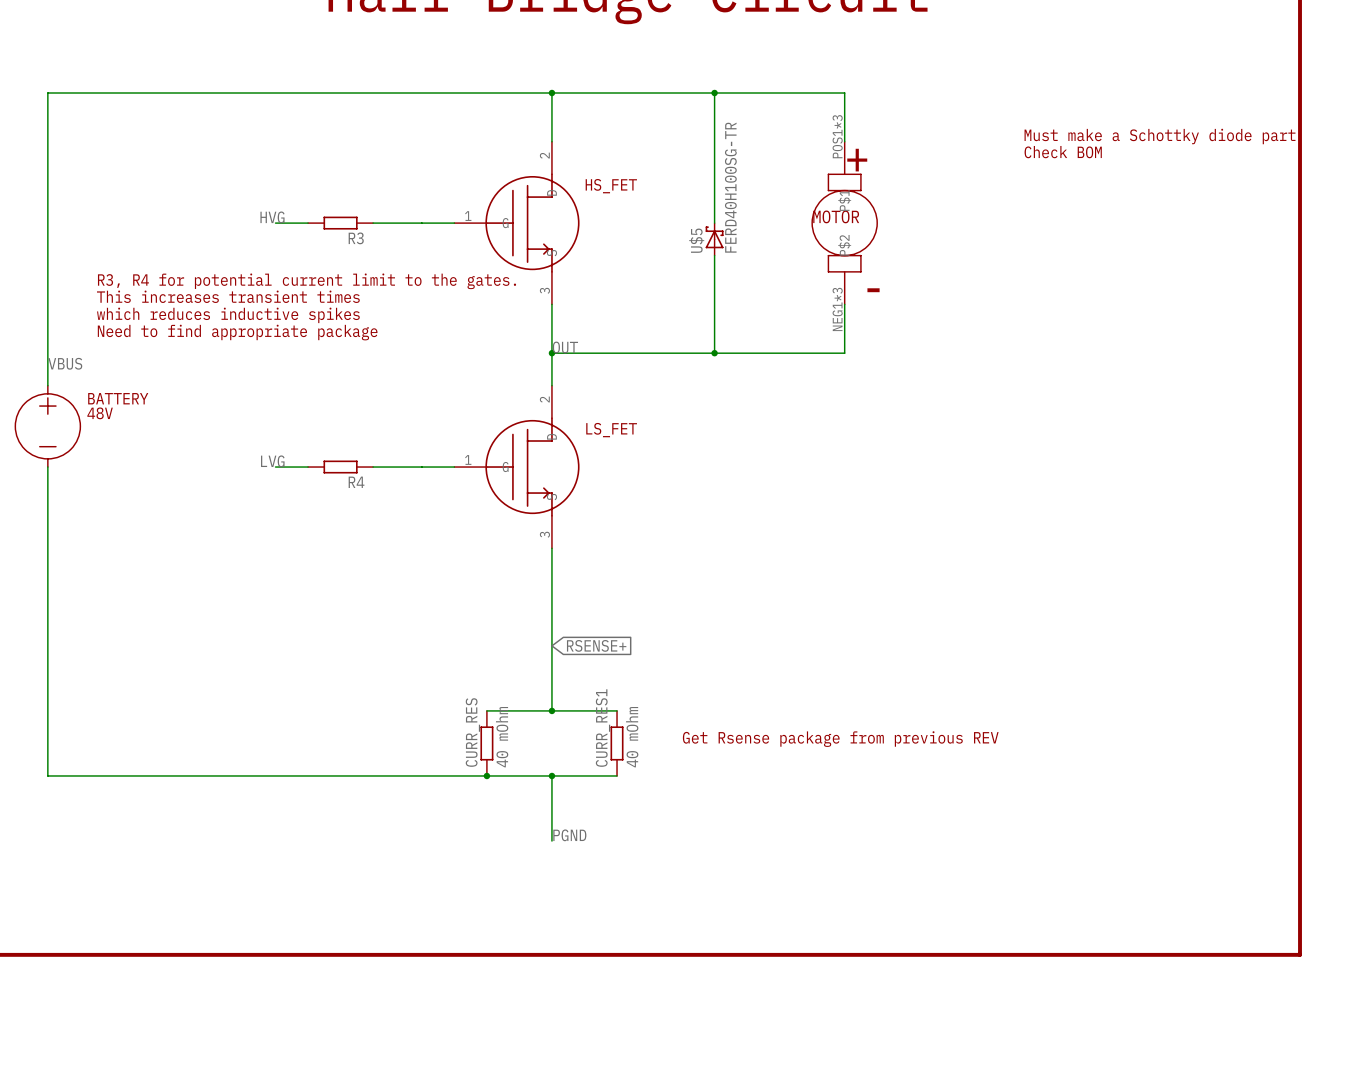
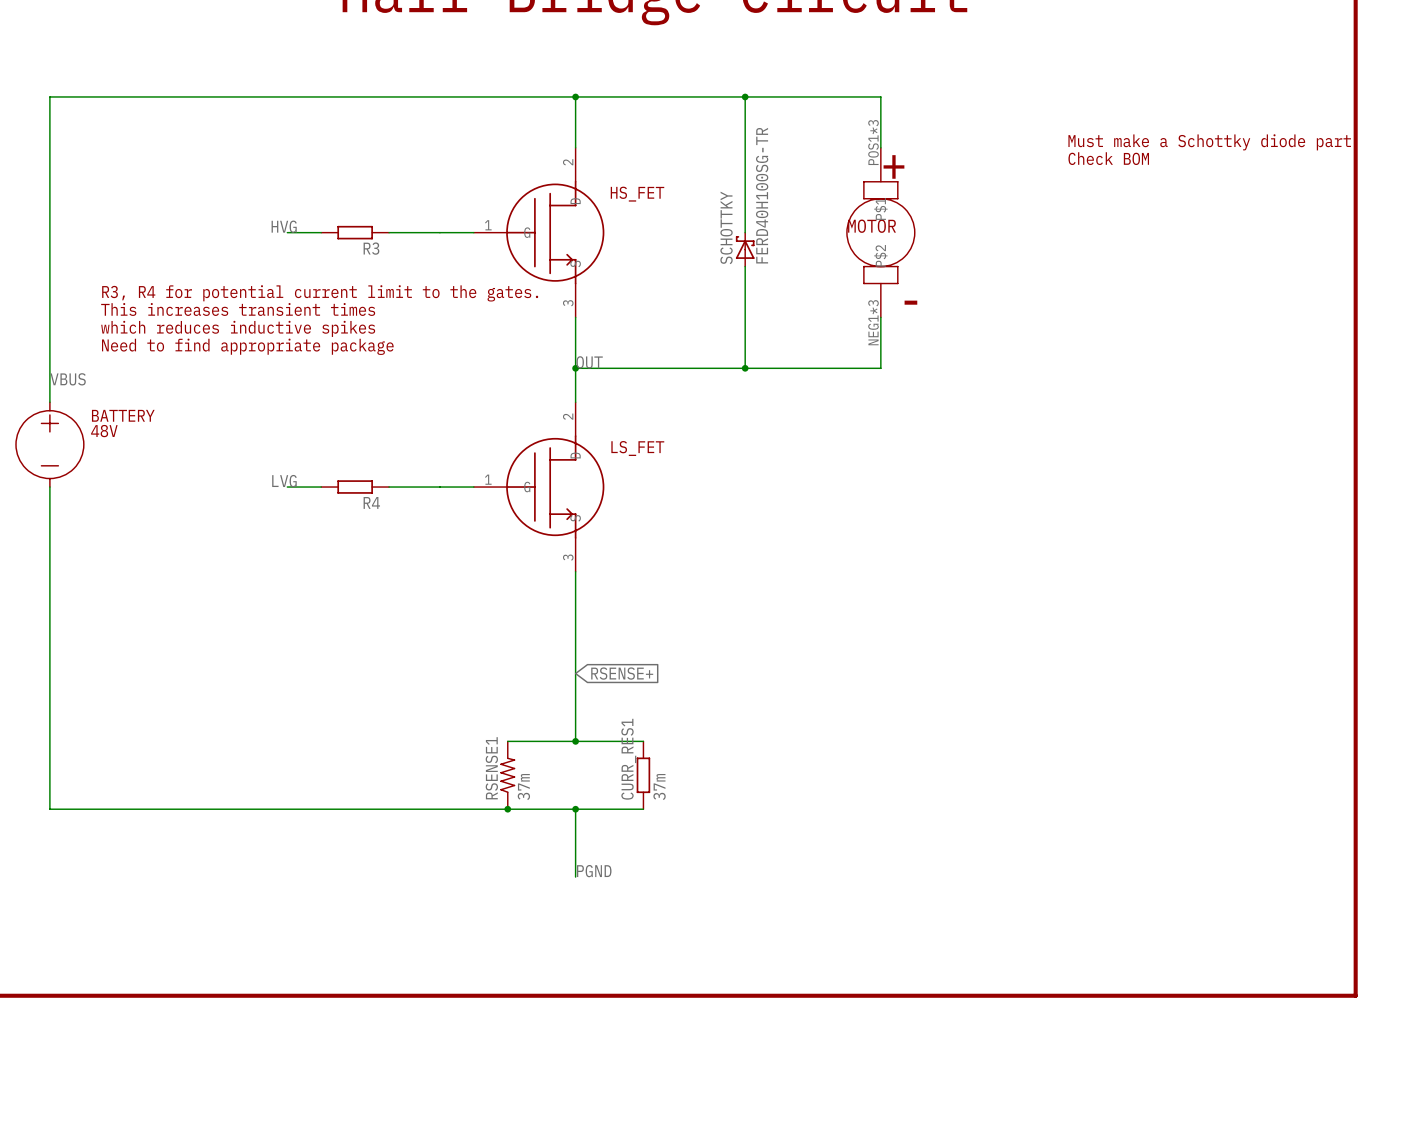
U$5 name: U$5 (696, 240) -> SCHOTTKY (726, 227)
CURR_RES1 value: 40 mOhm (632, 737) -> 37m (659, 787)
text: Get Rsense package from previous REV (840, 739) -> none
CURR_RES: 40 mOhm (486, 743) -> none
RSENSE1: none -> 37m (507, 775)

